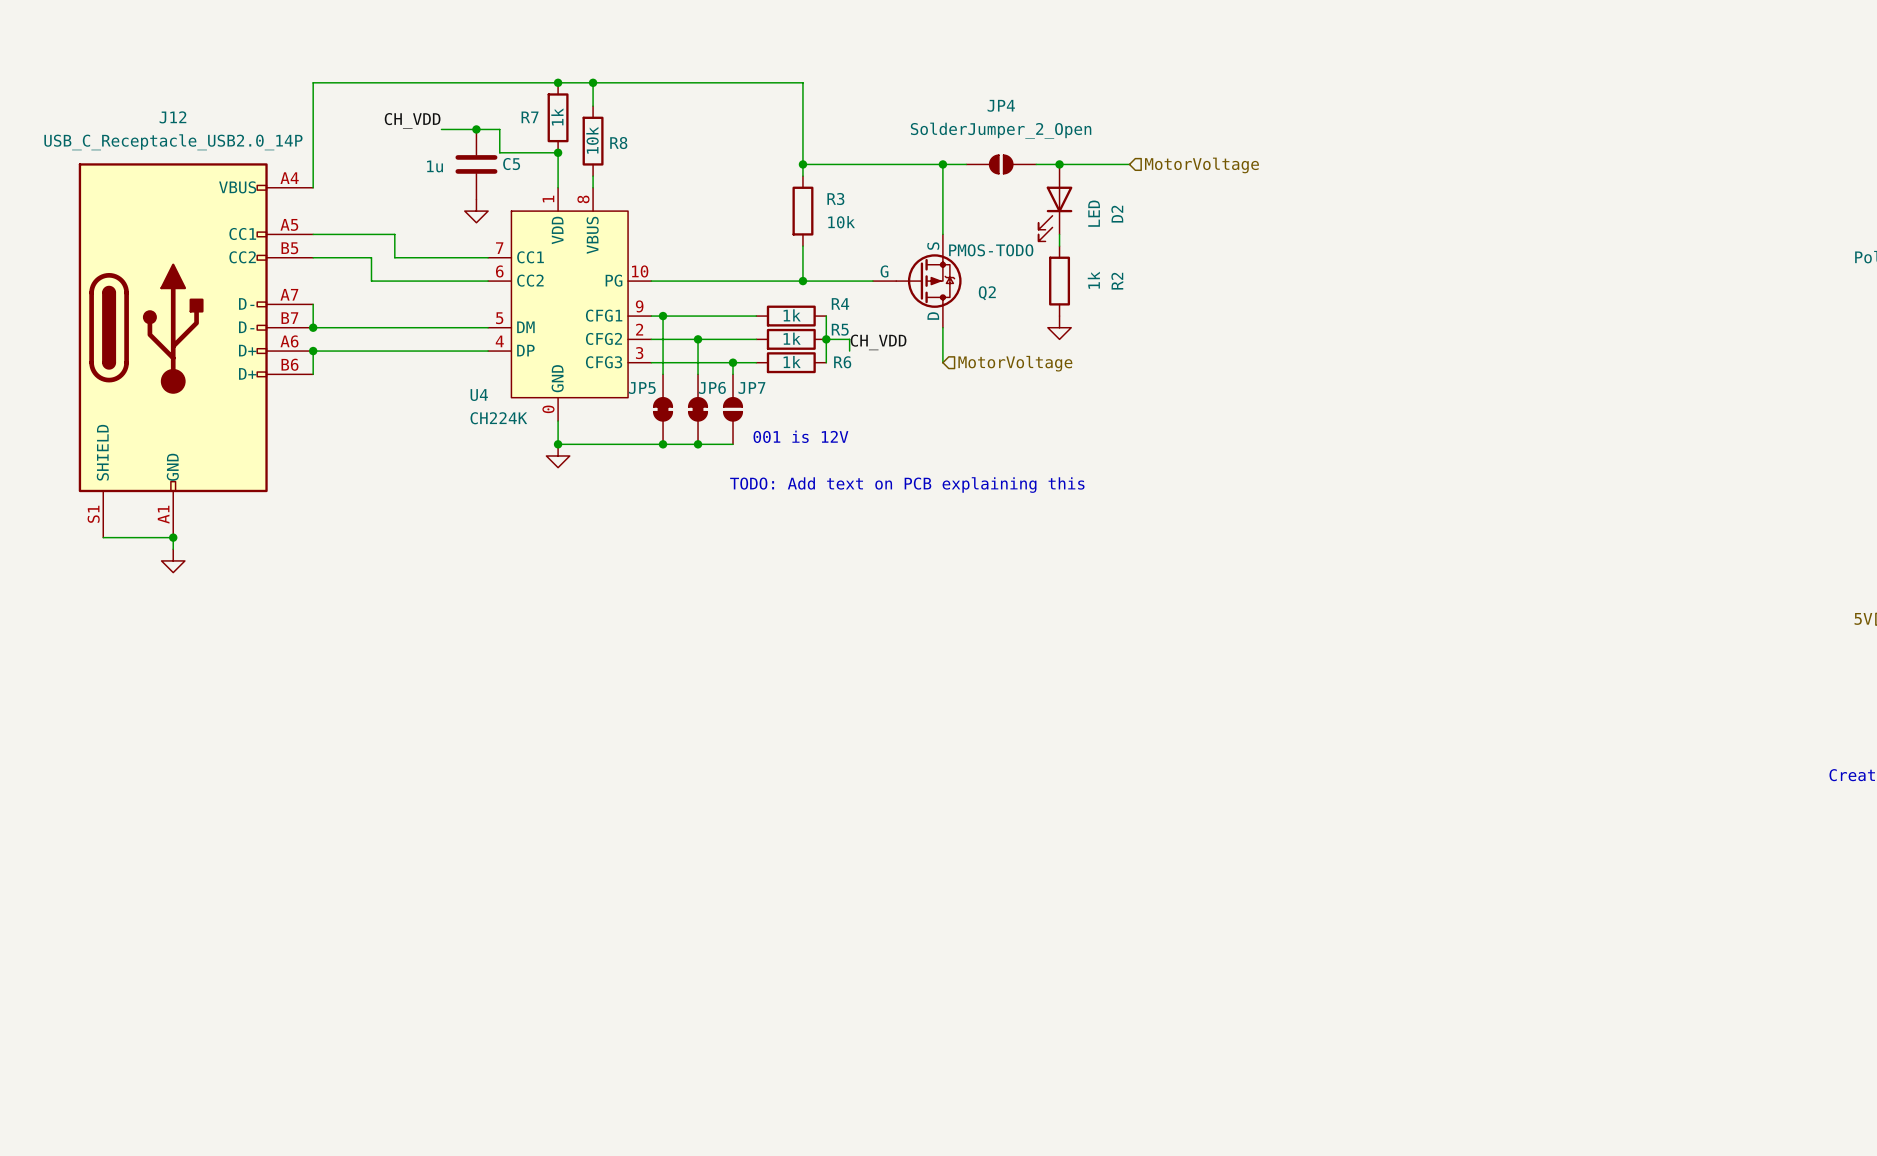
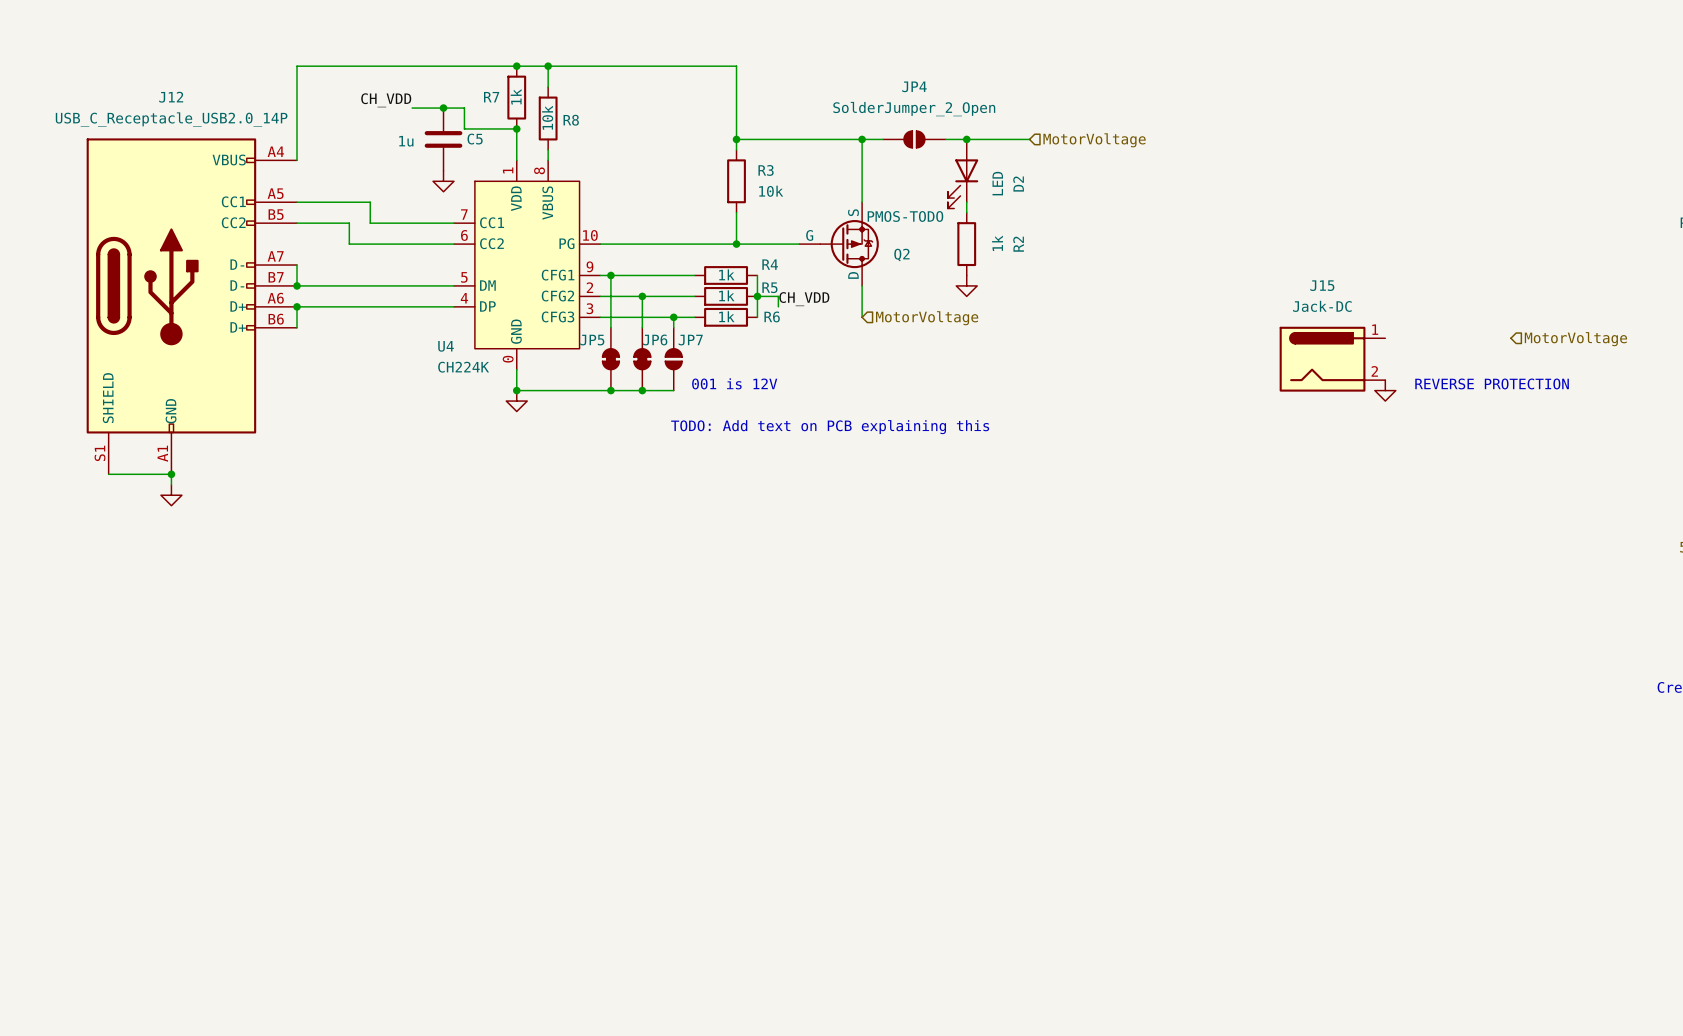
hierarchical label: none -> MotorVoltage (1575, 339)
J15: none -> Jack-DC (1332, 359)
text: none -> REVERSE PROTECTION (1492, 383)
power symbol: none -> (1385, 390)

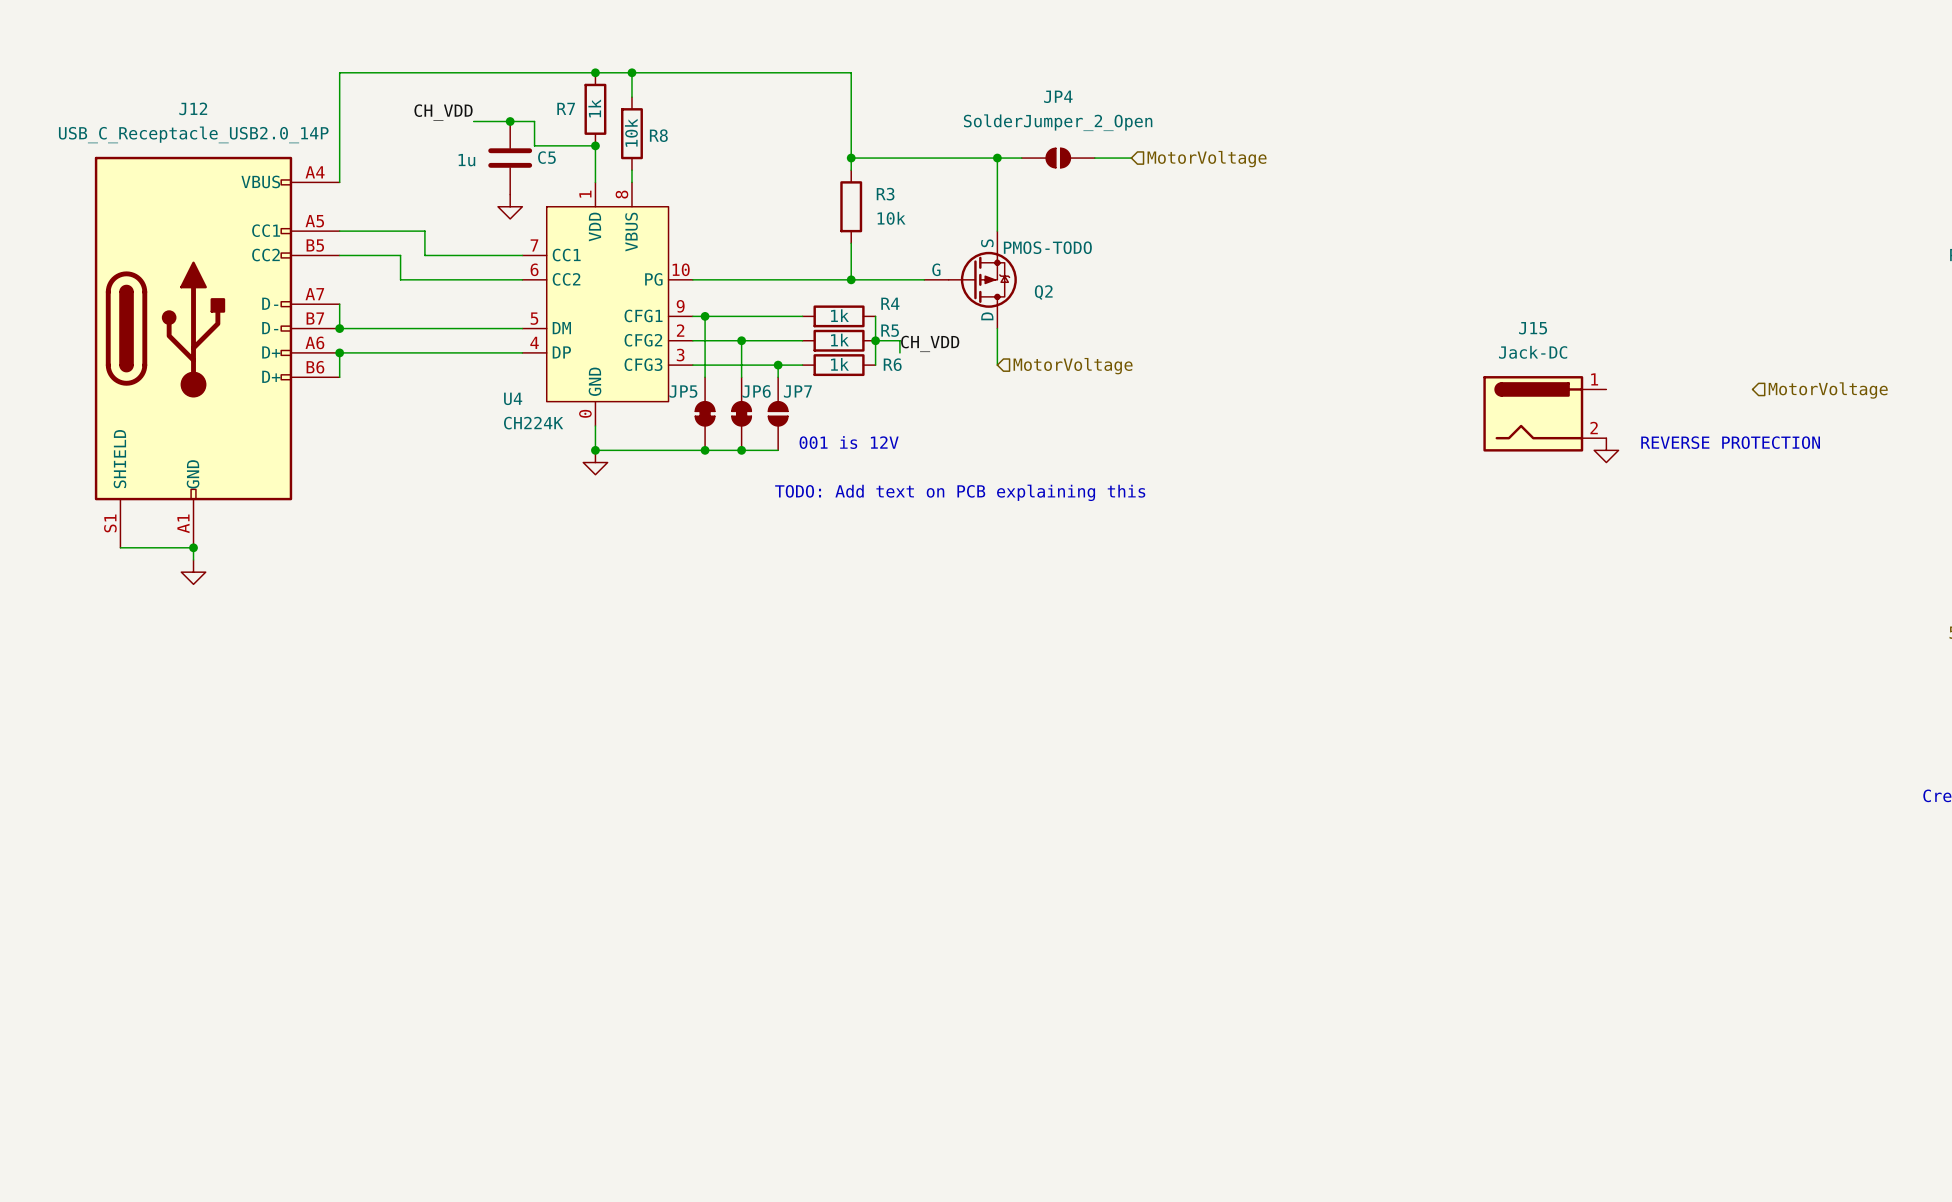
junction: (966, 139) -> none
wire: (977, 139) (1029, 139) -> none
hierarchical label position: MotorVoltage (1094, 140) -> MotorVoltage (1207, 159)
D2: LED (963, 173) -> none
wire: (966, 202) (966, 212) -> none
R2: 1k (966, 244) -> none
power symbol: (966, 285) -> none

